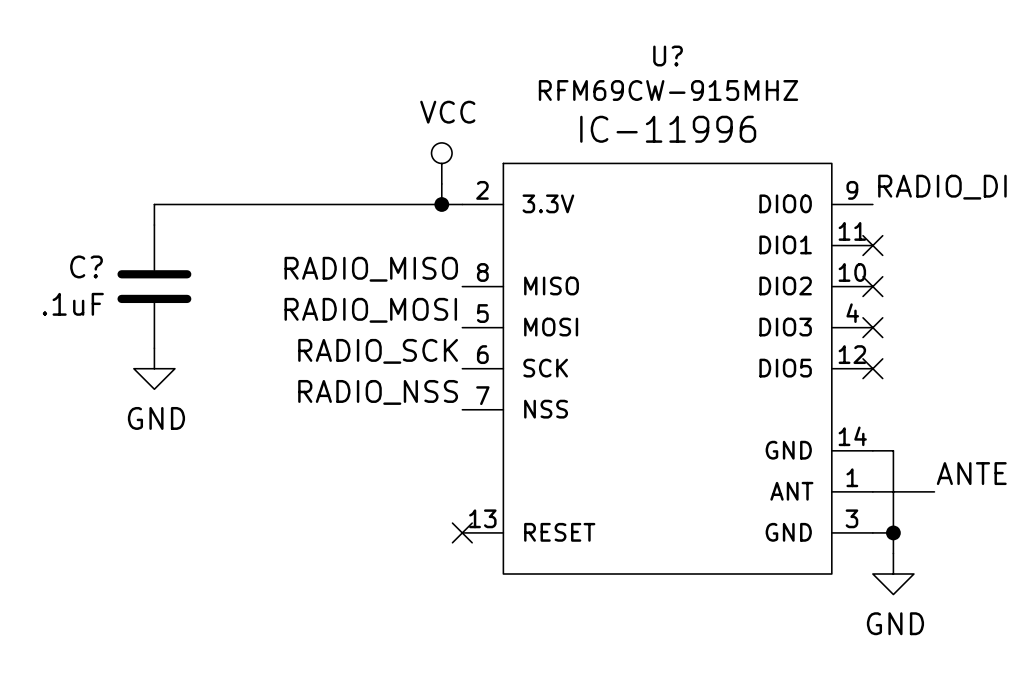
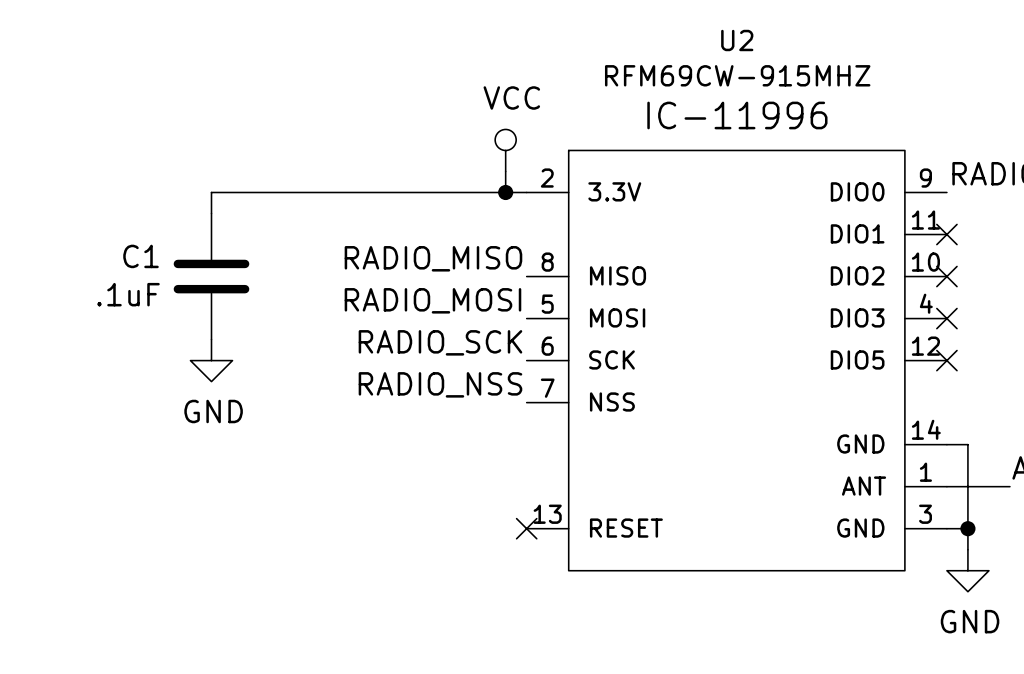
U? name: U? (668, 56) -> U2 (737, 40)
C? name: C? (86, 266) -> C1 (140, 256)

